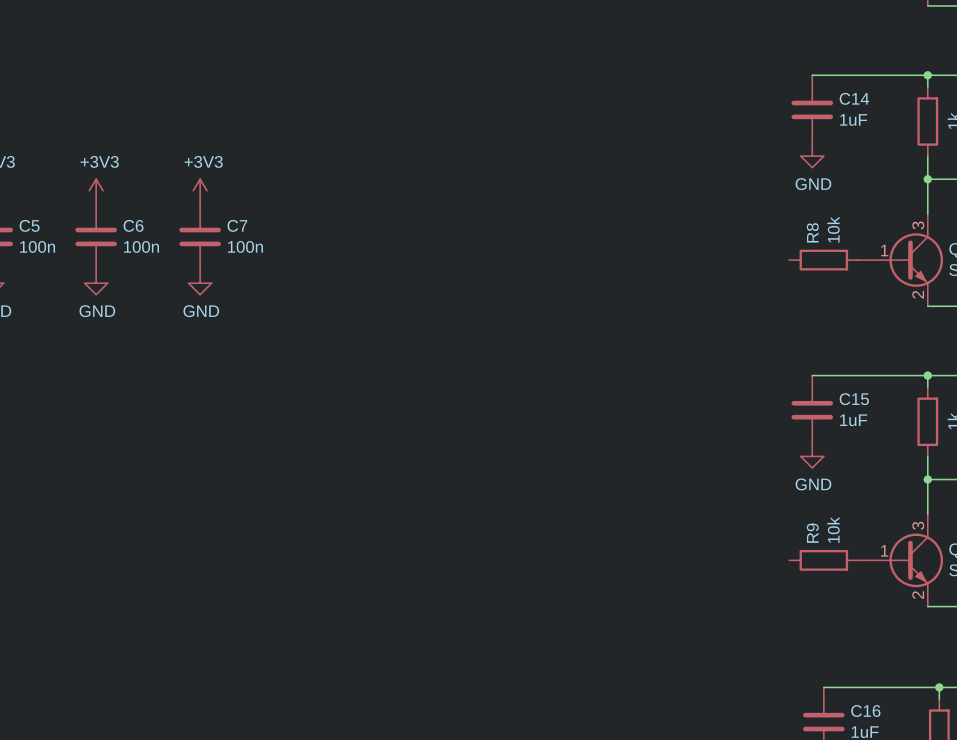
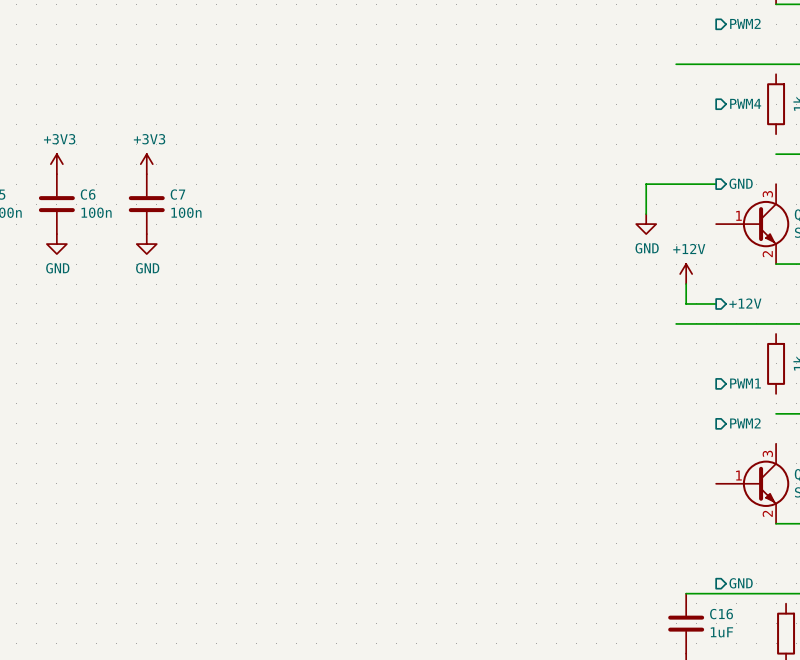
sheet pin: none -> PWM2 (745, 23)
wire: (927, 75) (927, 86) -> none
junction: (927, 75) -> none
C14: 1uF (812, 109) -> none
sheet pin: none -> PWM4 (745, 103)
power symbol: GND (812, 156) -> none
wire: (927, 156) (927, 213) -> none
junction: (927, 179) -> none
wire: none -> (716, 184) (646, 184) (646, 214)
sheet pin: none -> GND (741, 183)
power symbol: none -> GND (646, 224)
R8: 10k (823, 260) -> none
power symbol: none -> +12V (686, 274)
wire: none -> (686, 284) (686, 303) (716, 303)
sheet pin: none -> +12V (745, 303)
wire: (927, 375) (927, 387) -> none
junction: (927, 375) -> none
C15: 1uF (812, 410) -> none
sheet pin: none -> PWM1 (745, 383)
power symbol: GND (812, 456) -> none
wire: (927, 456) (927, 514) -> none
junction: (927, 479) -> none
sheet pin: none -> PWM2 (745, 423)
R9: 10k (823, 560) -> none
sheet pin: none -> GND (741, 583)
wire: (939, 687) (939, 698) -> none
junction: (939, 687) -> none

